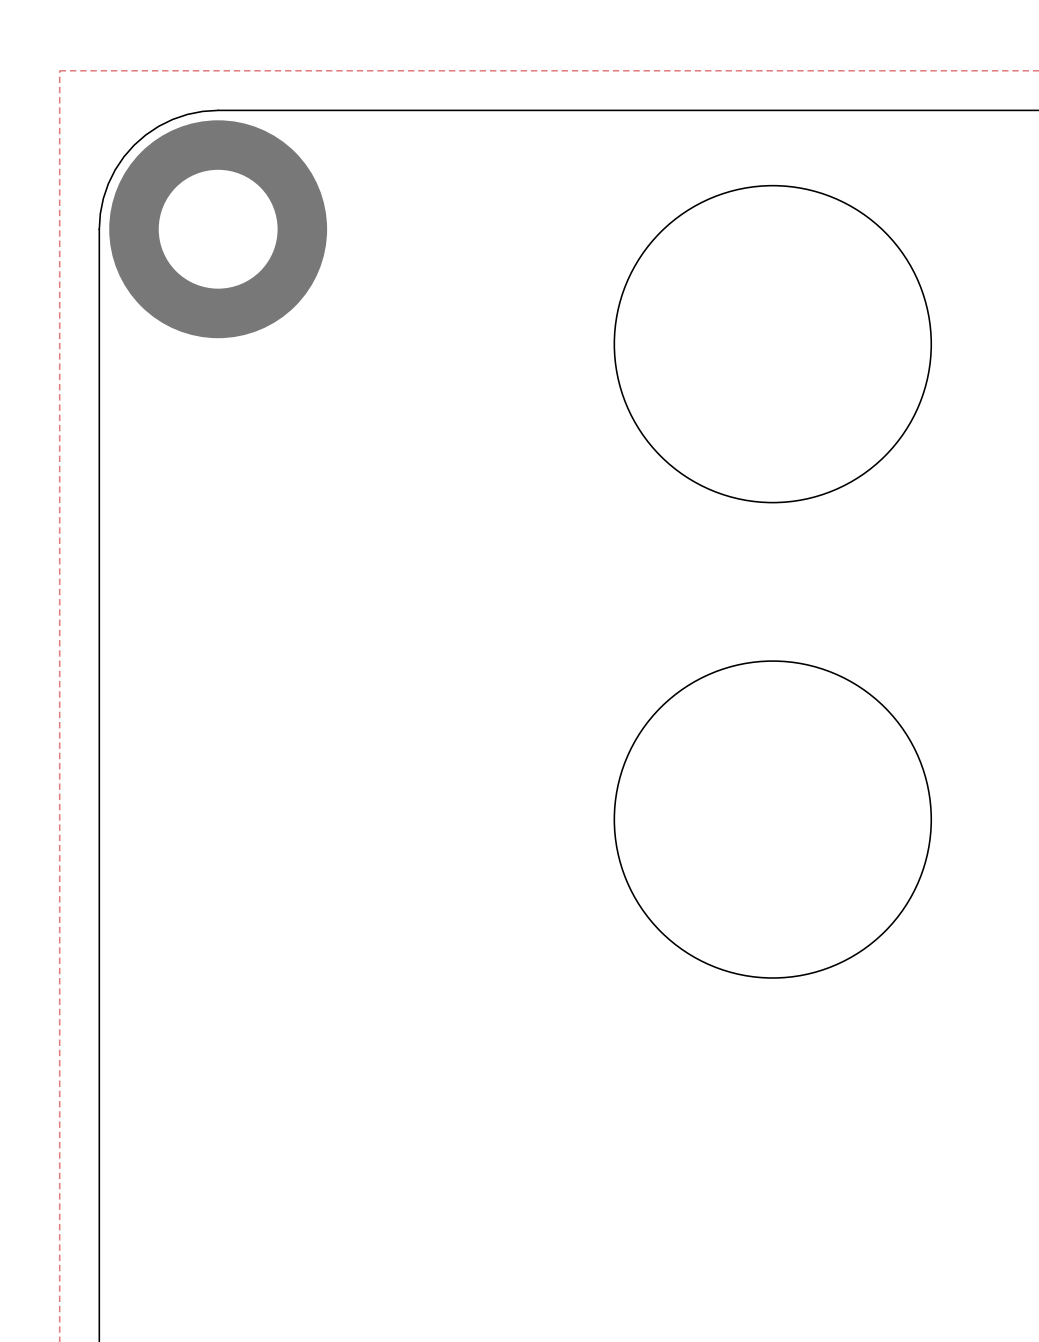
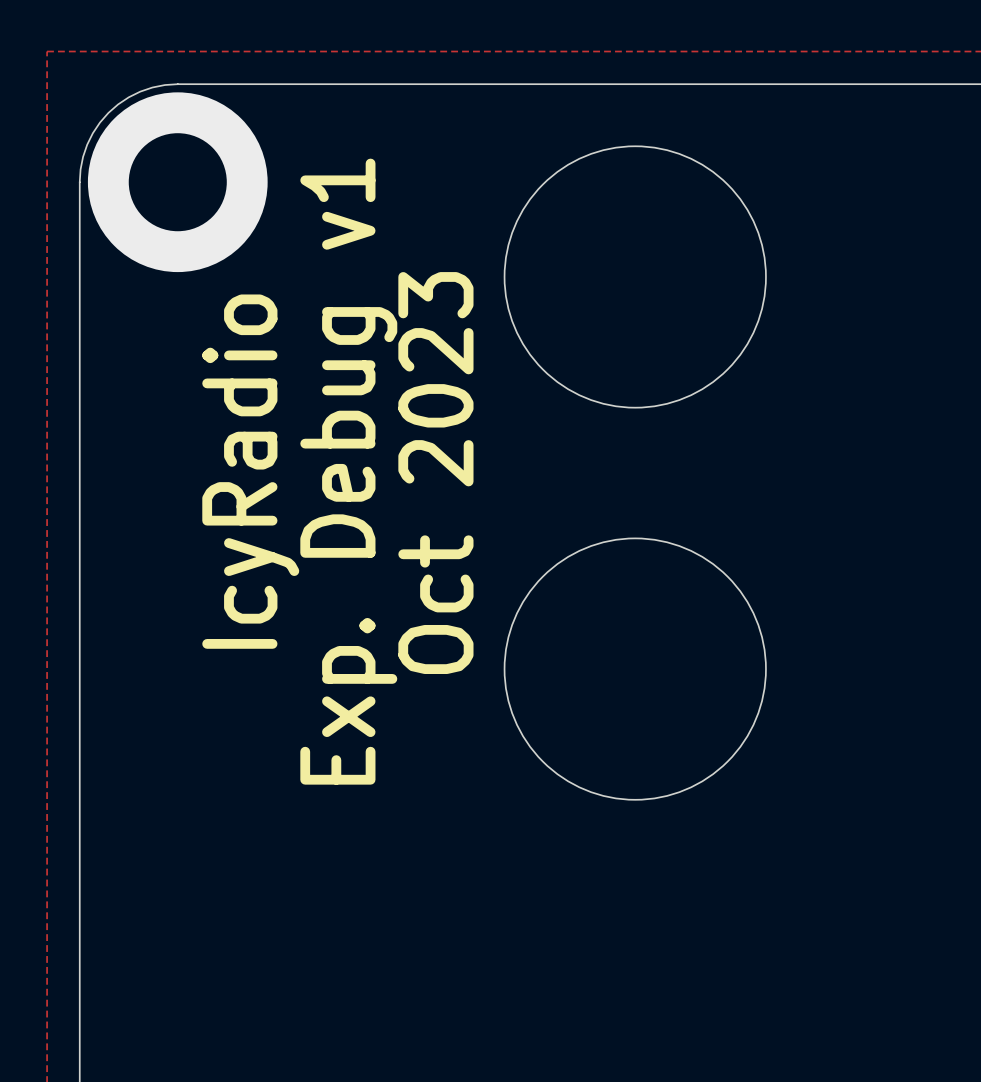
text: none -> IcyRadio (250, 471)
text: none -> Exp. Debug v1 (348, 471)
text: none -> Oct 2023 (435, 473)

